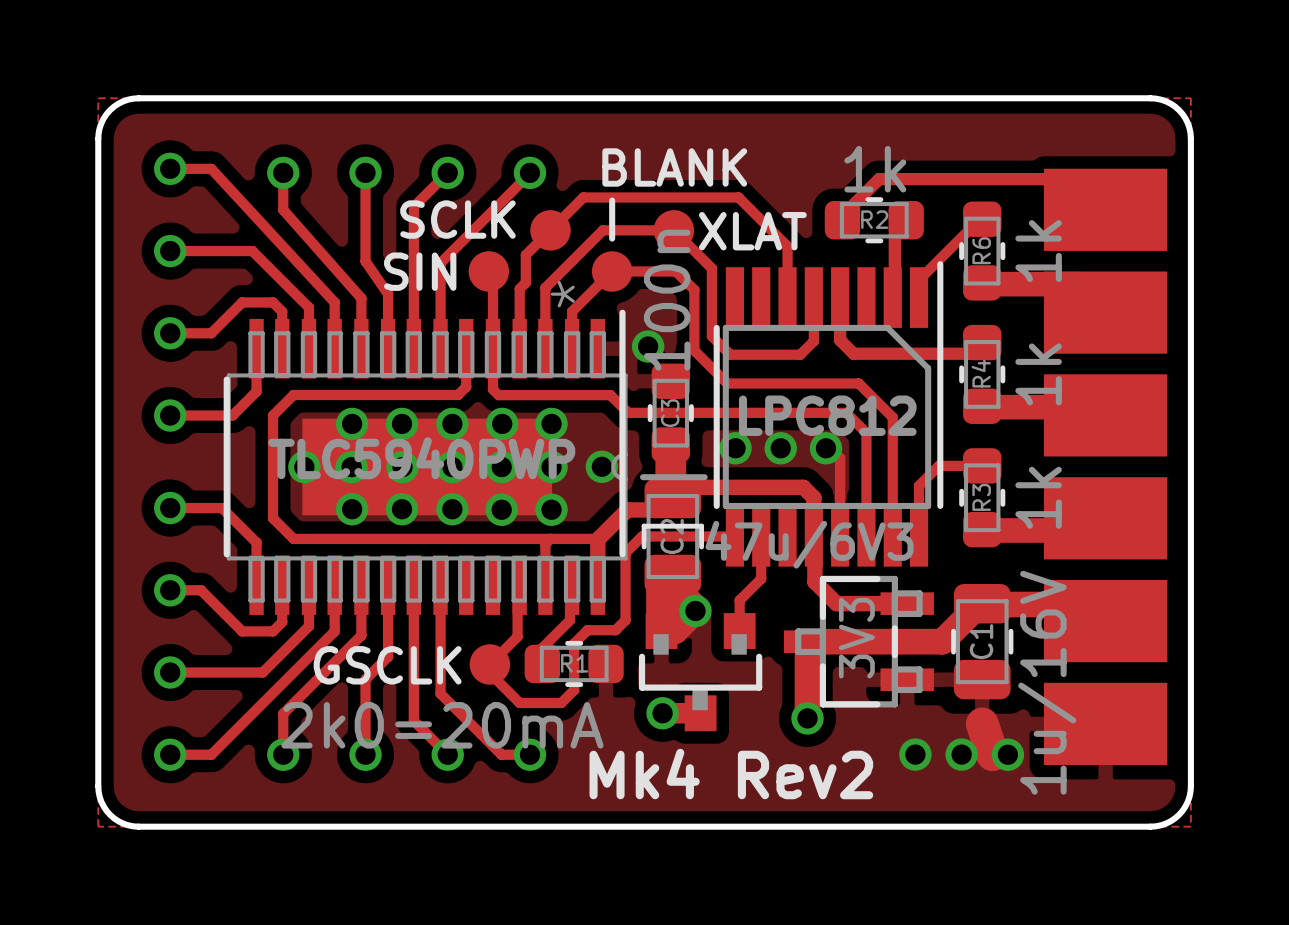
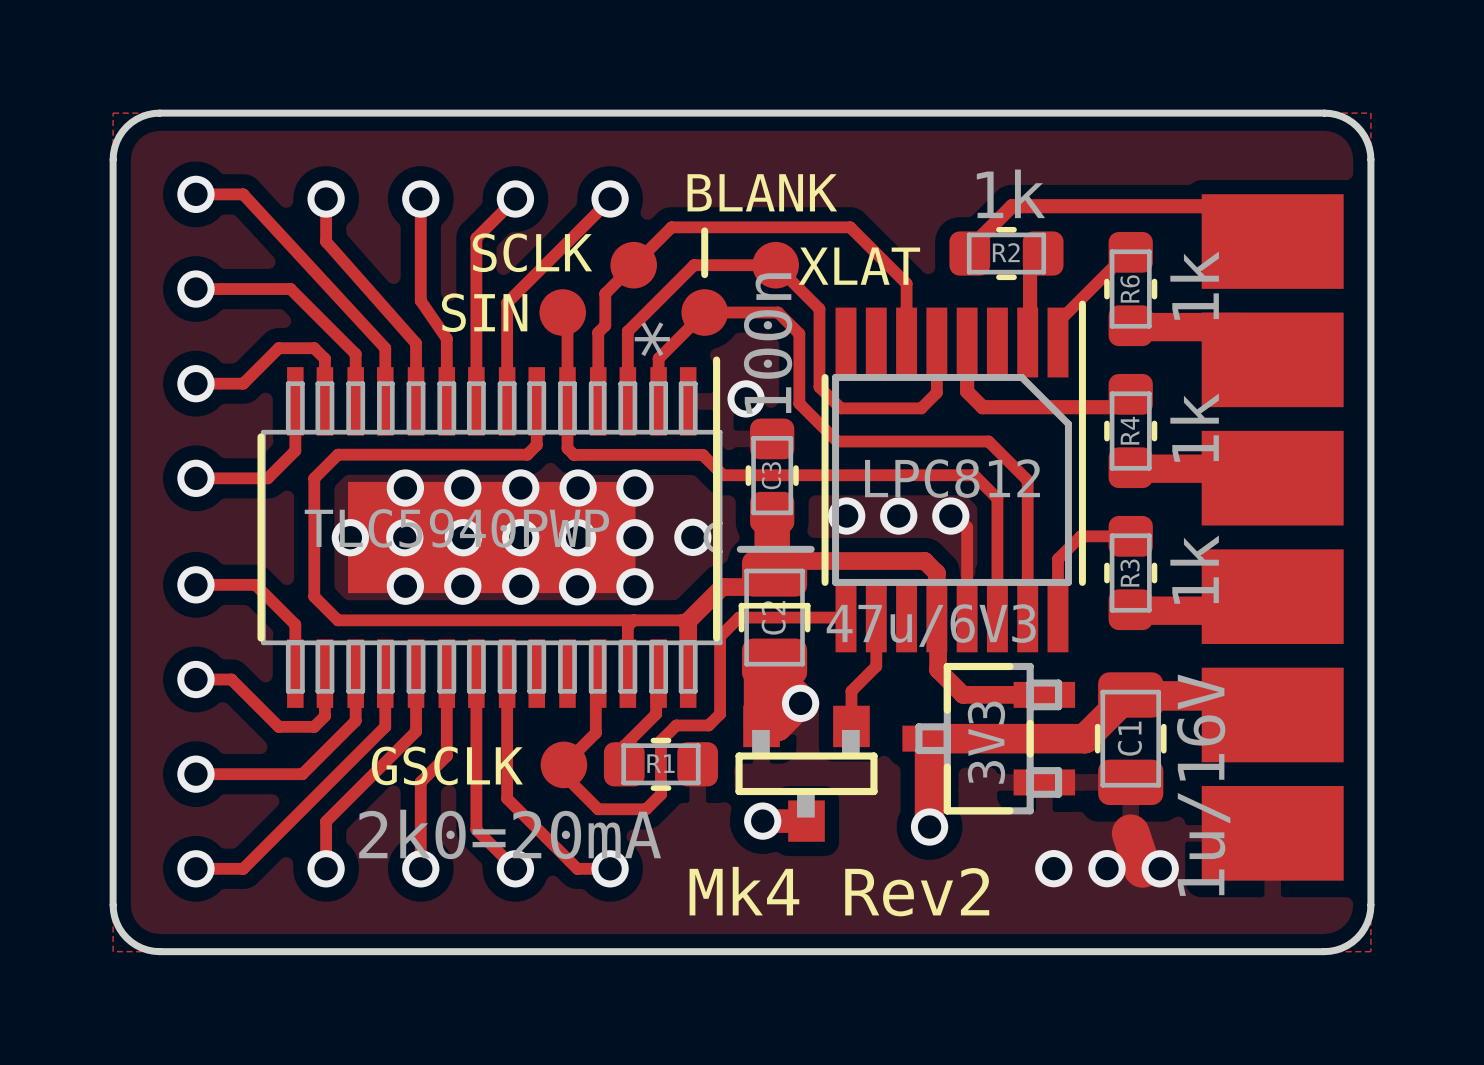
part footprint: [638, 613, 763, 732] -> [735, 705, 878, 842]

